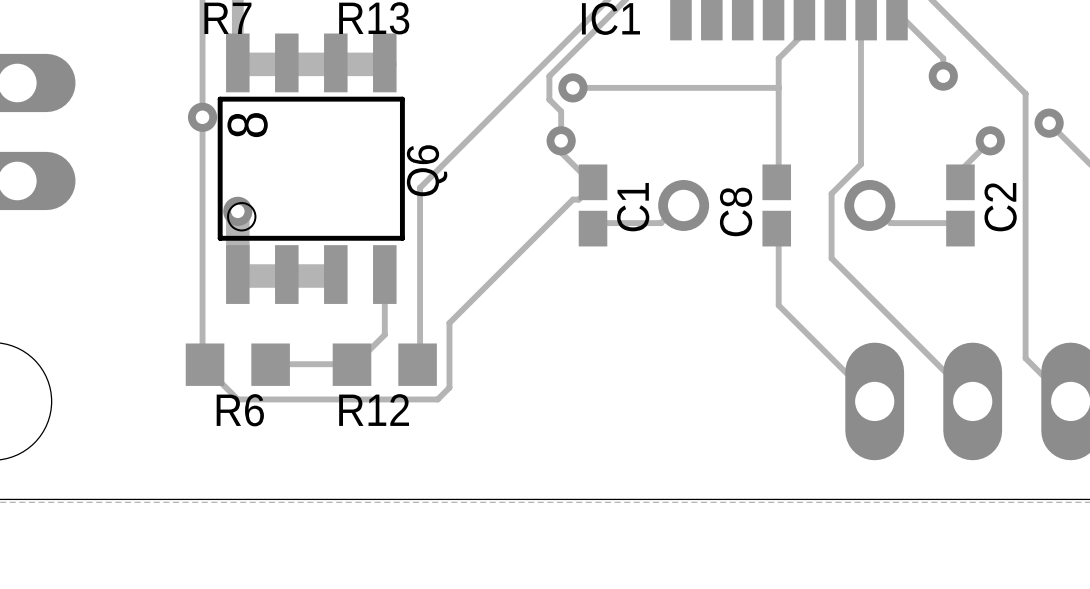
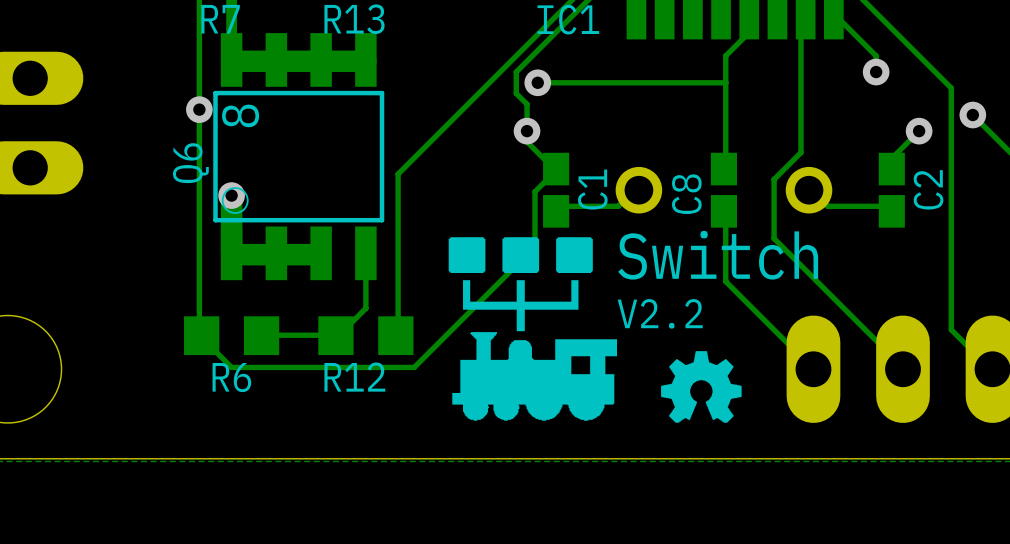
Q6 name position: Q6 (427, 170) -> Q6 (190, 163)
track: (593, 182) (590, 187) (578, 199) (572, 199) (449, 323) (449, 387) -> (556, 169) (535, 191) (535, 246) (424, 356)
drawing: none -> [448, 237, 617, 421]
text: none -> Switch (718, 255)
text: none -> V2.2 (660, 313)
drawing: none -> [661, 351, 742, 423]

